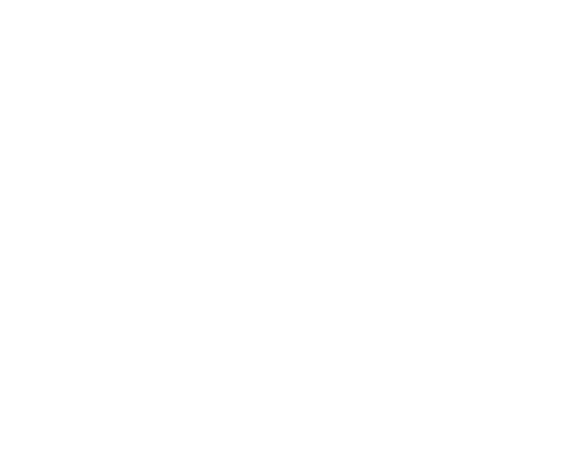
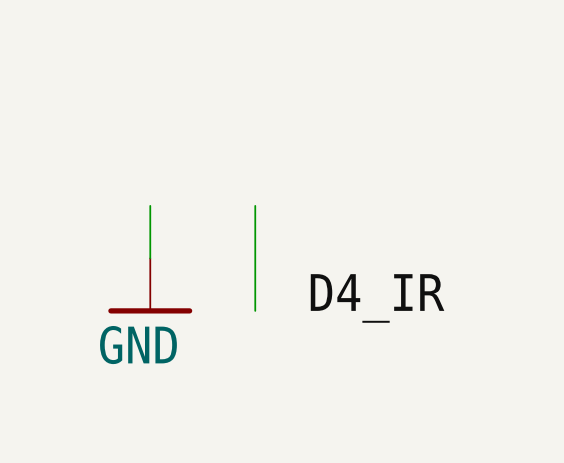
wire: none -> (150, 205) (150, 258)
wire: none -> (255, 205) (255, 310)
power symbol: none -> GND (150, 285)
label: none -> D4_IR (377, 298)

